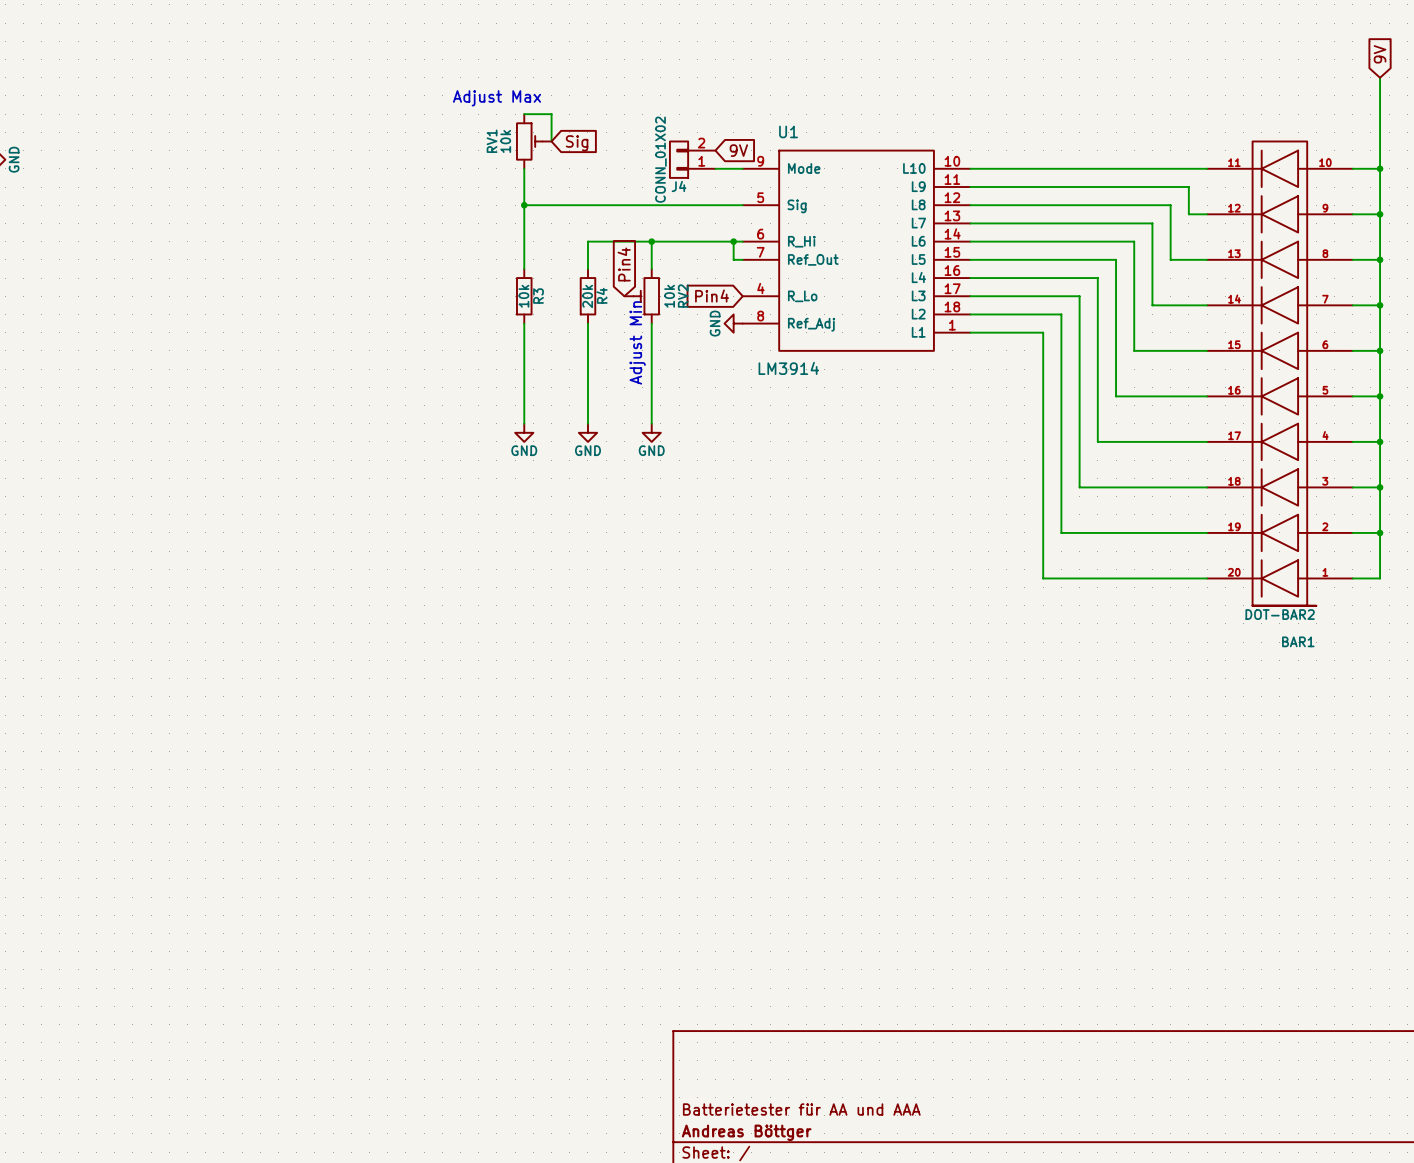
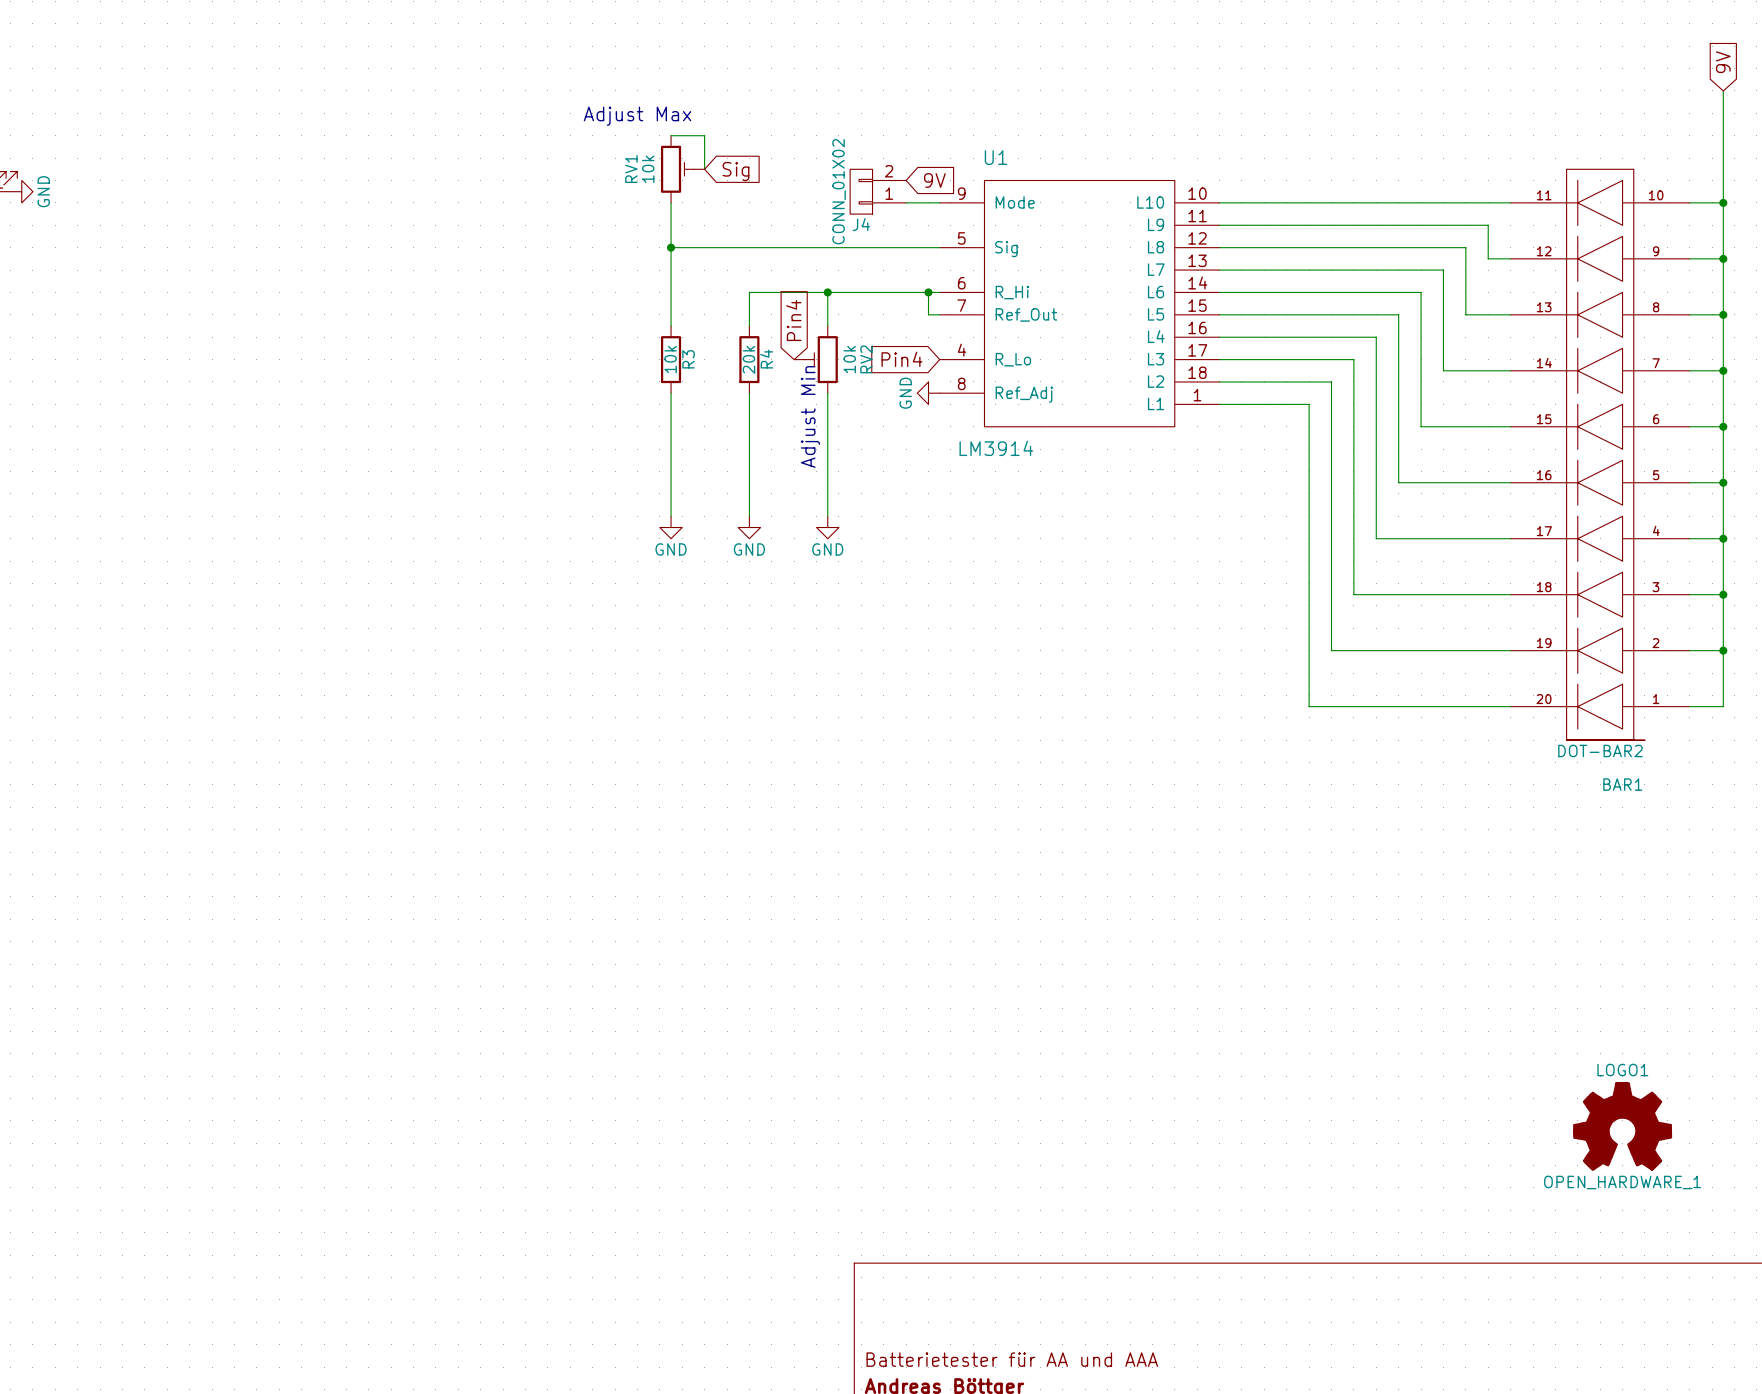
LOGO1: none -> OPEN_HARDWARE_1 (1622, 1126)

